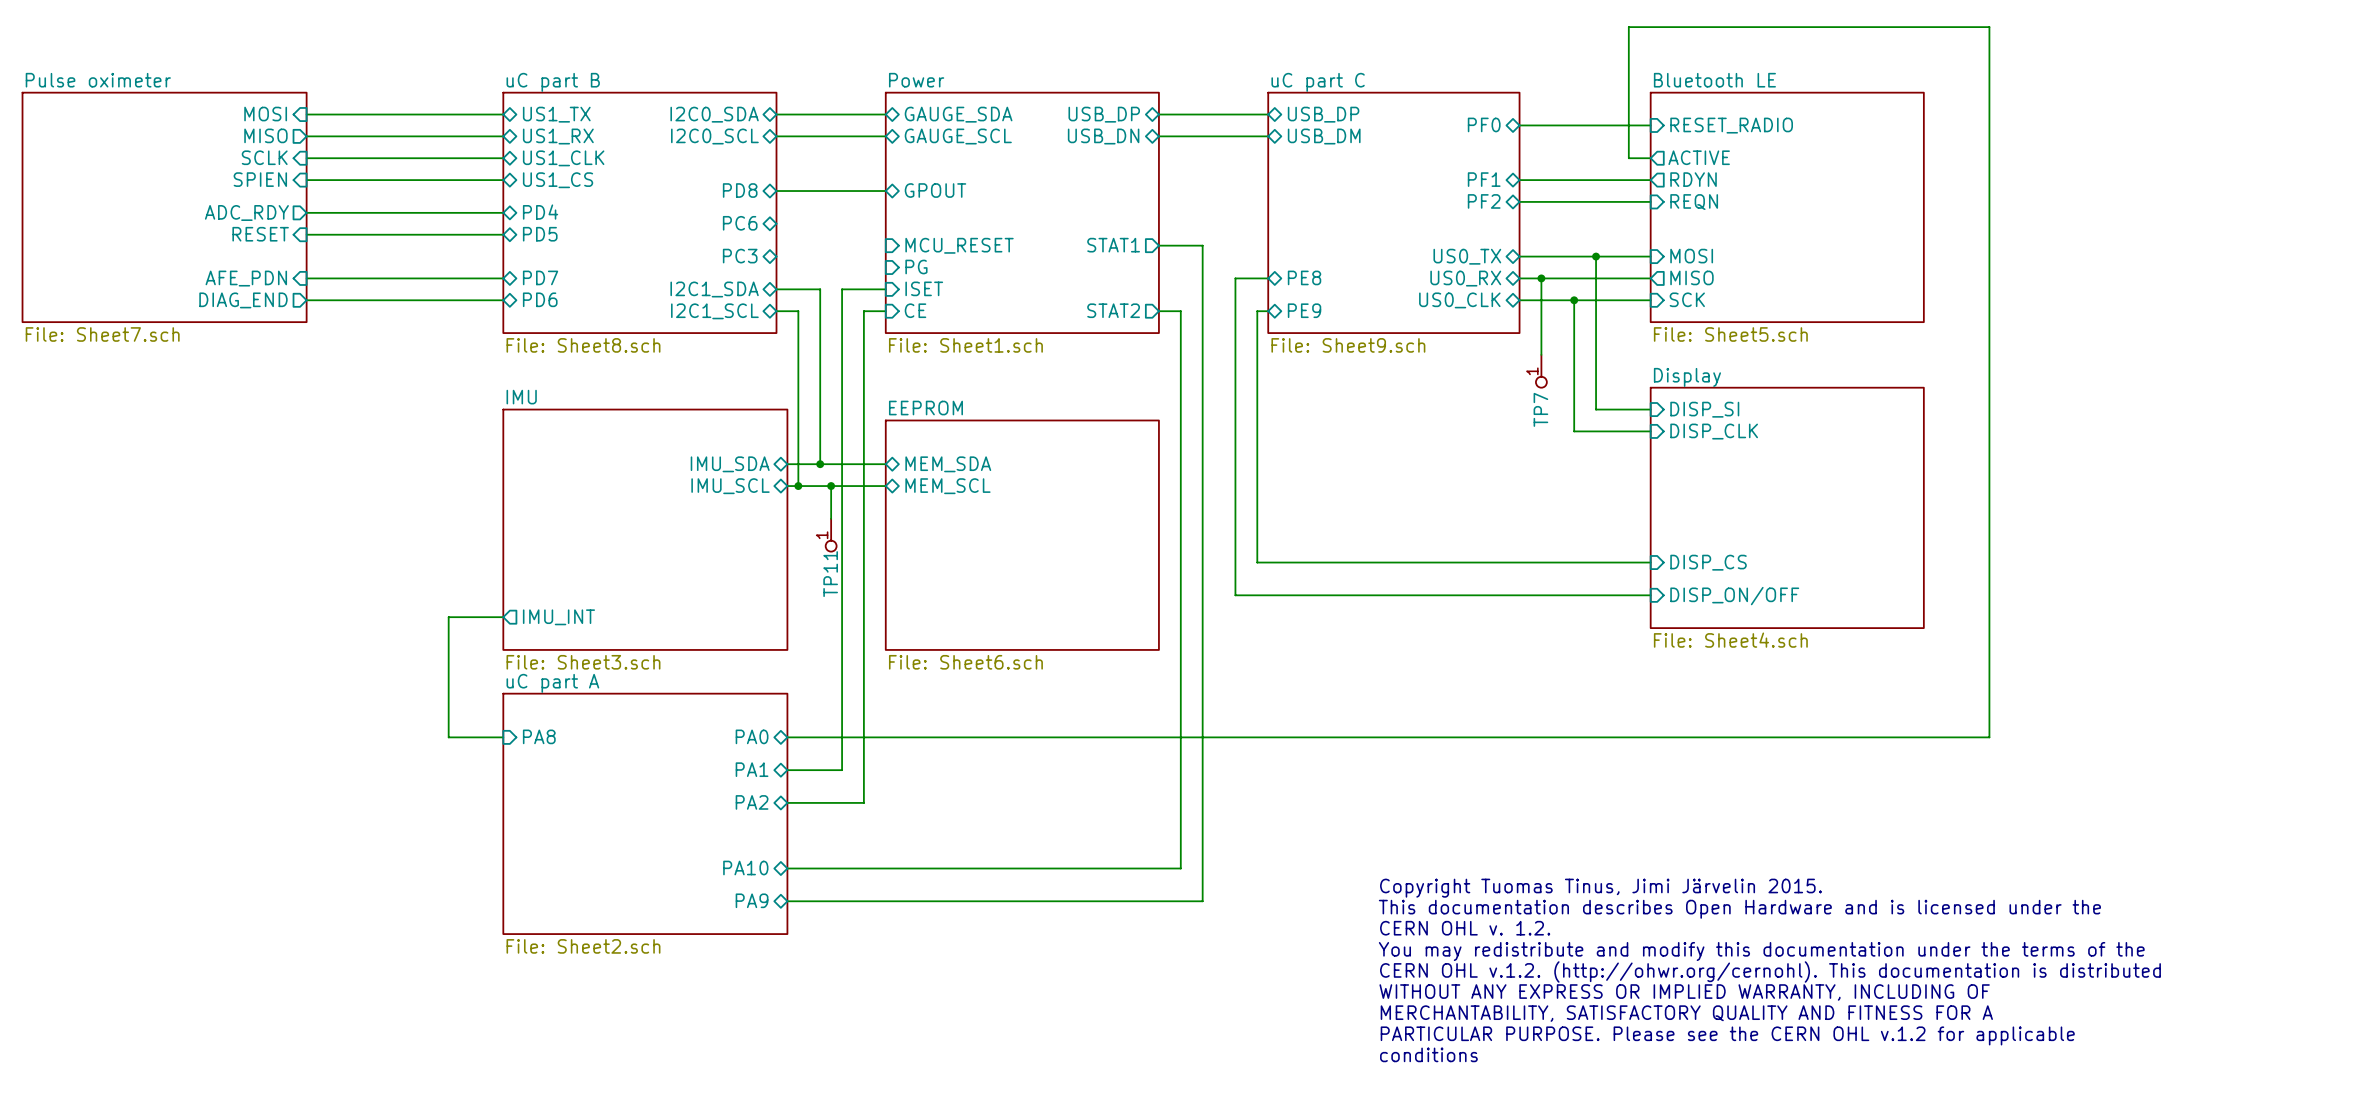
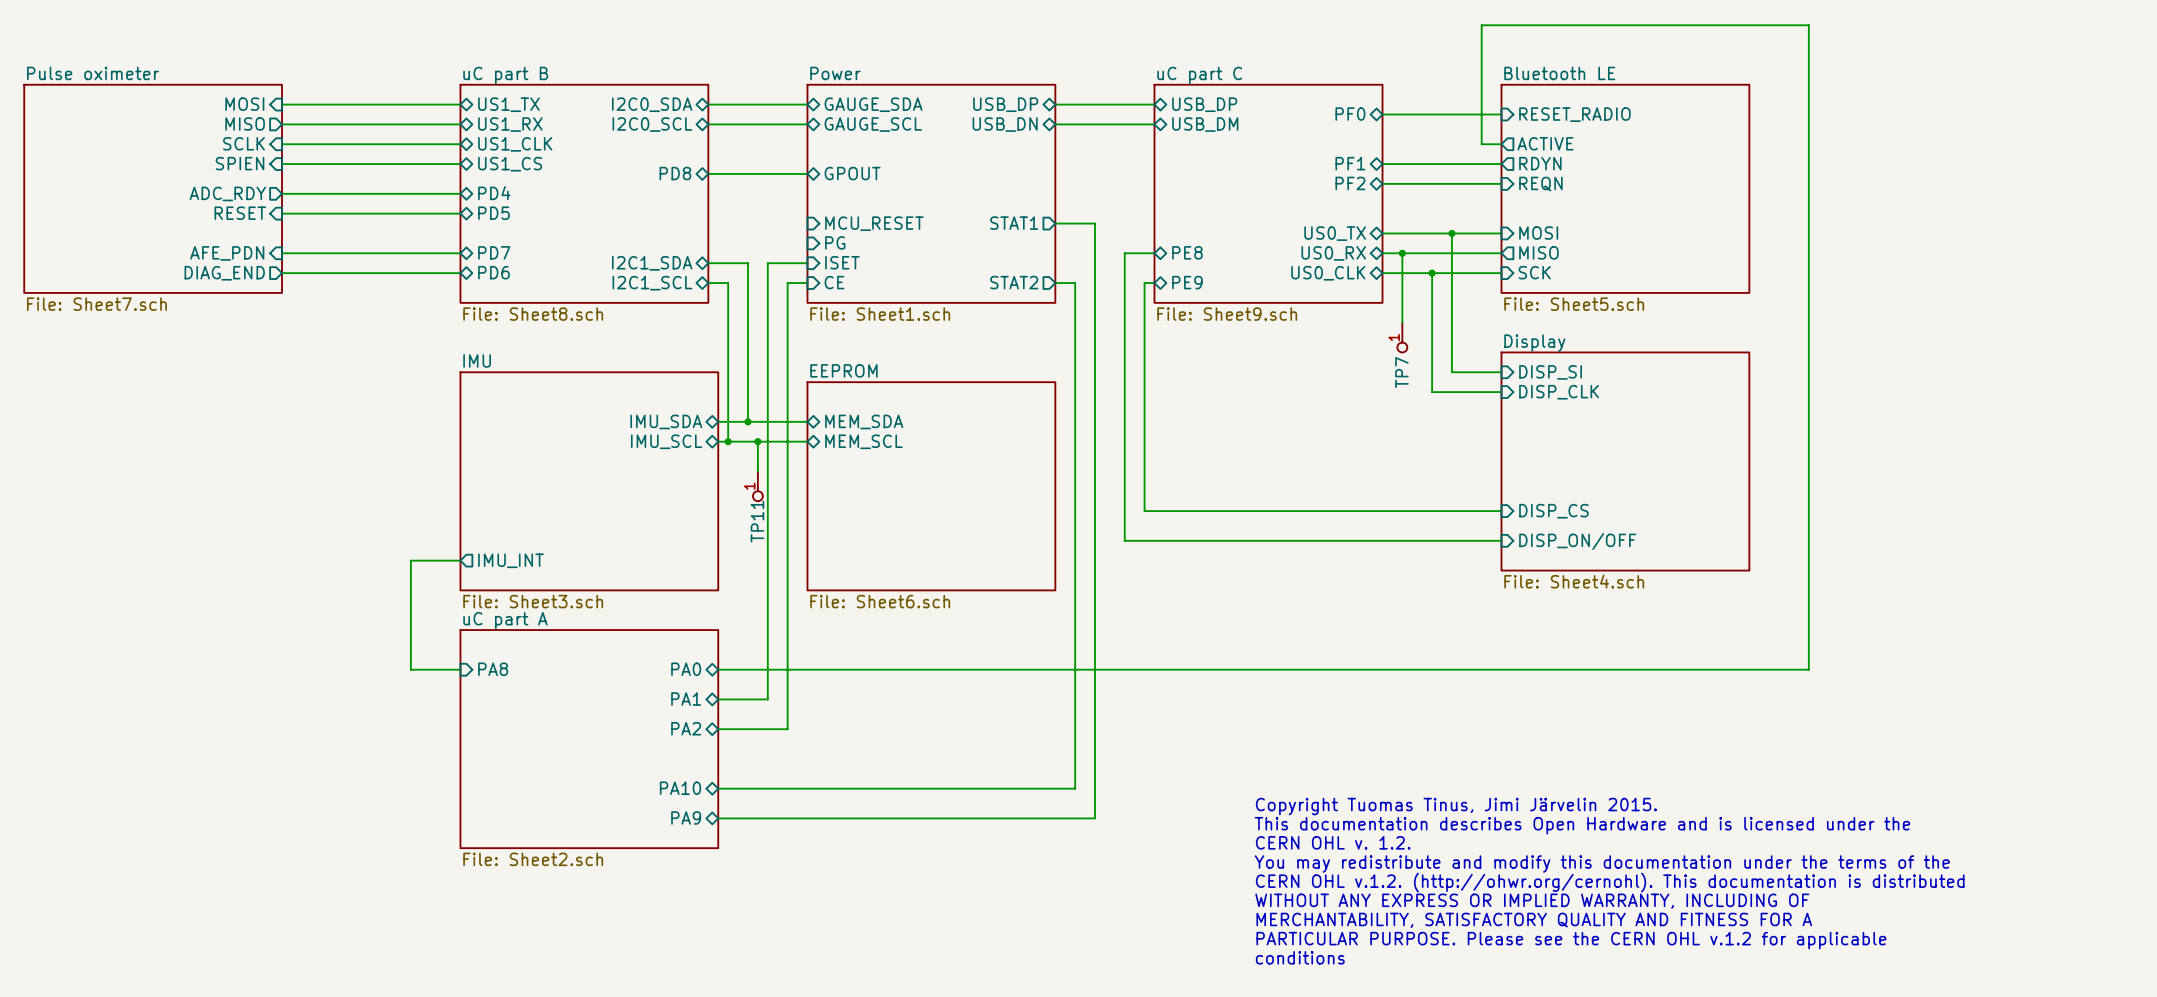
sheet pin: PC6 (740, 223) -> none
sheet pin: PC3 (740, 256) -> none

